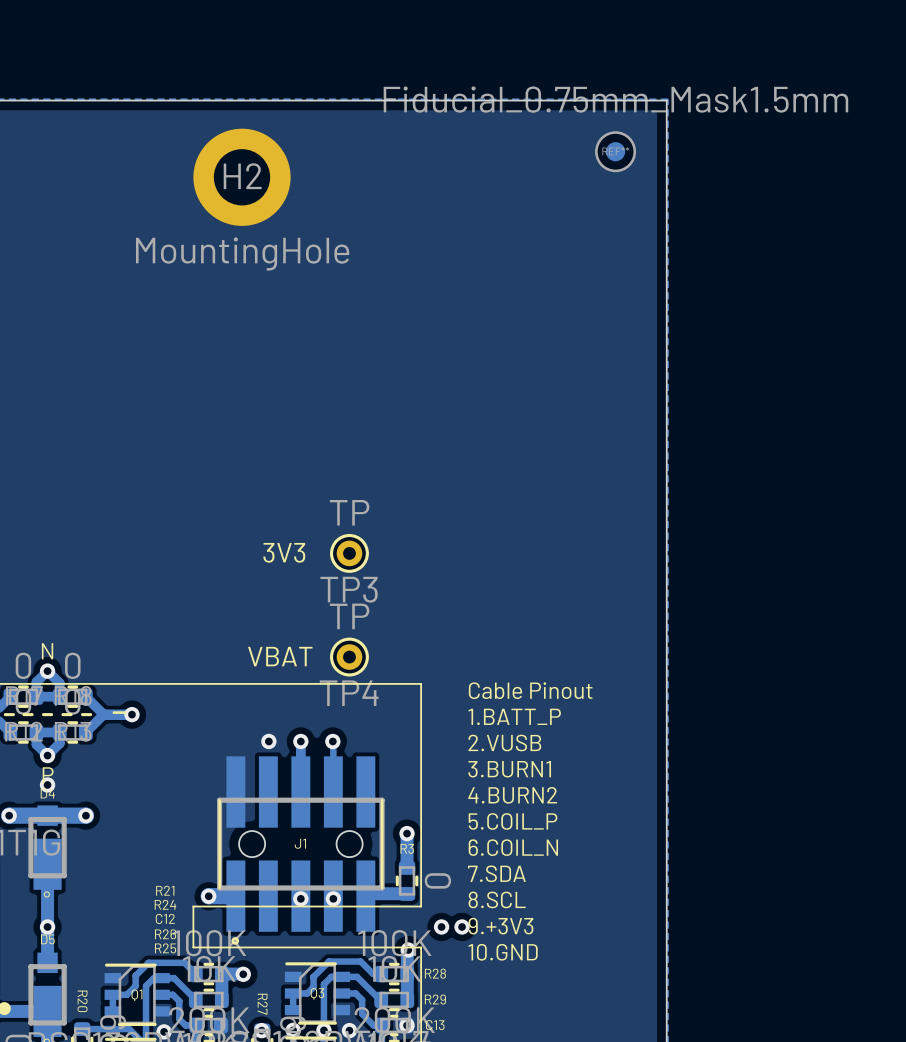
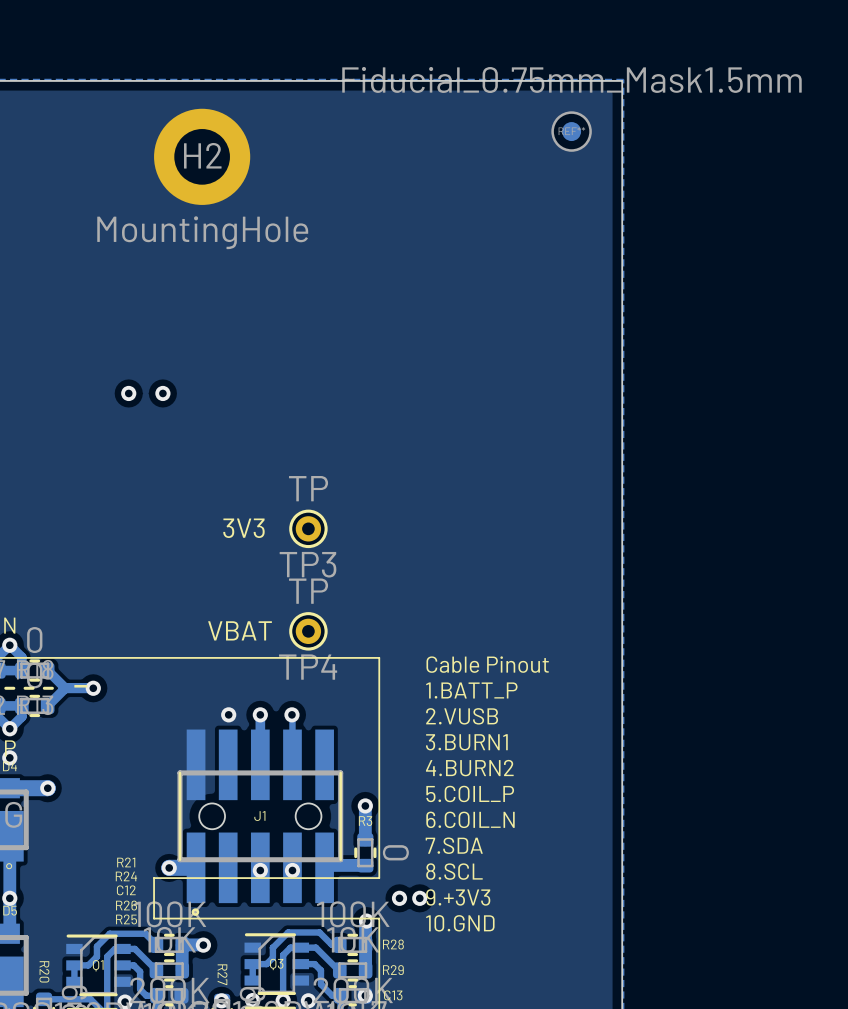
via: none -> (128, 393)
via: none -> (162, 393)

